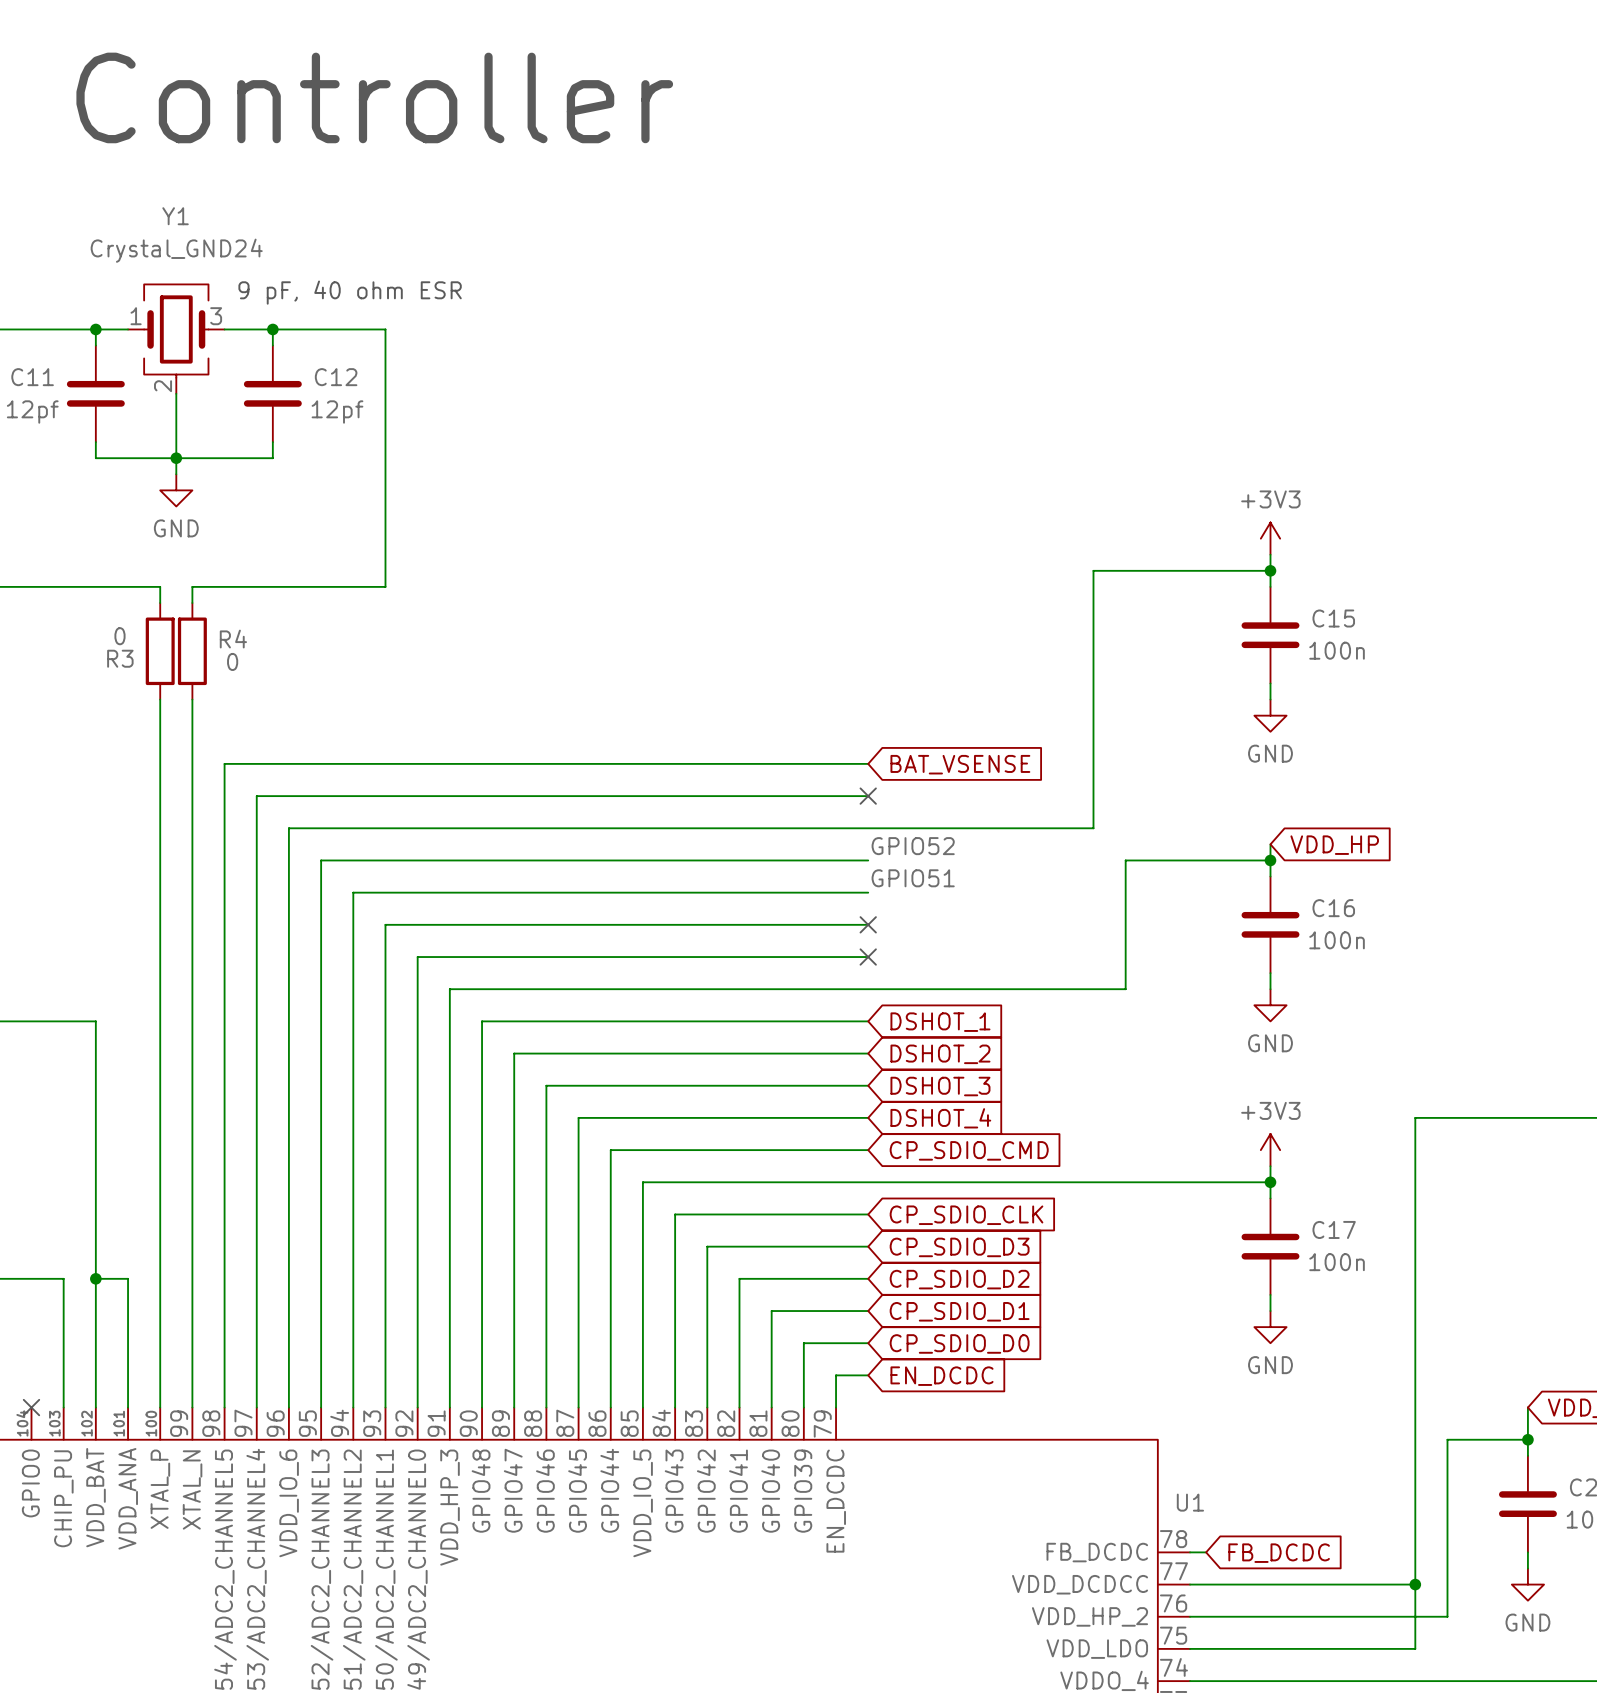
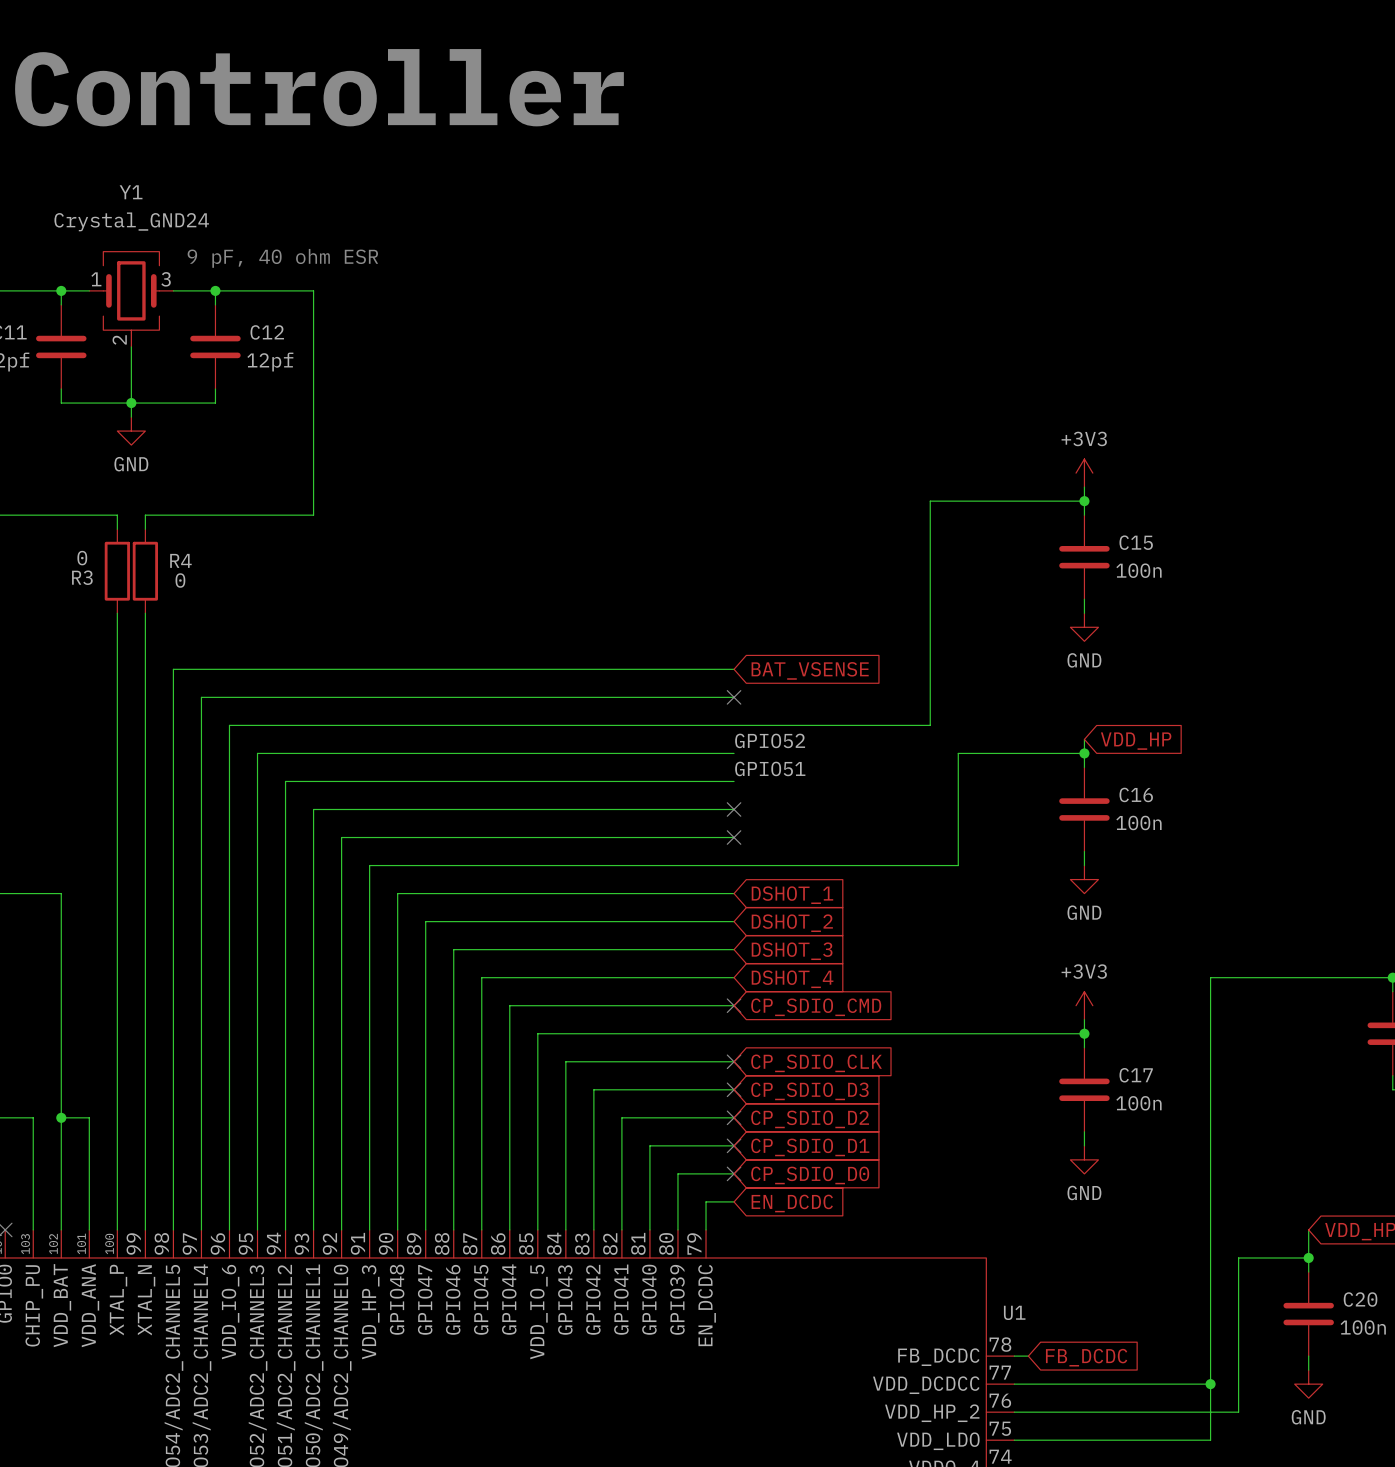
no-connect mark: none -> (734, 1005)
no-connect mark: none -> (734, 1061)
no-connect mark: none -> (734, 1089)
no-connect mark: none -> (734, 1117)
no-connect mark: none -> (734, 1145)
no-connect mark: none -> (734, 1173)

